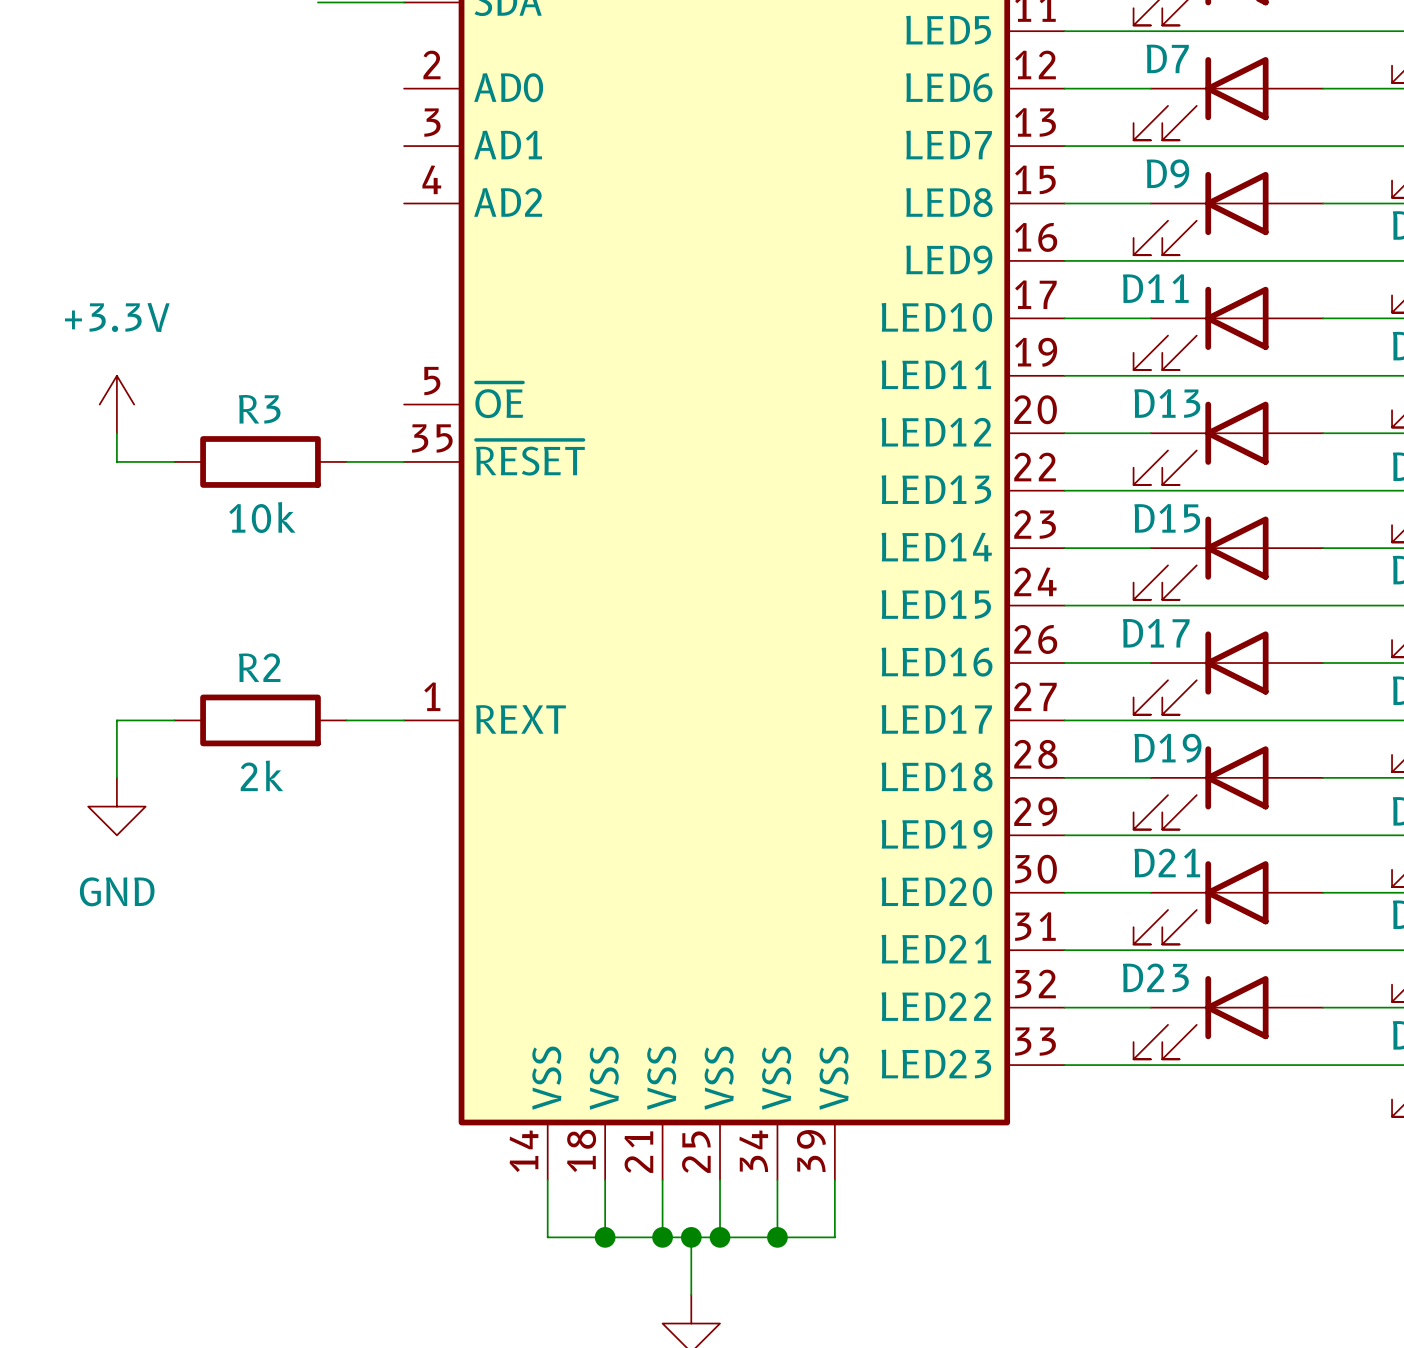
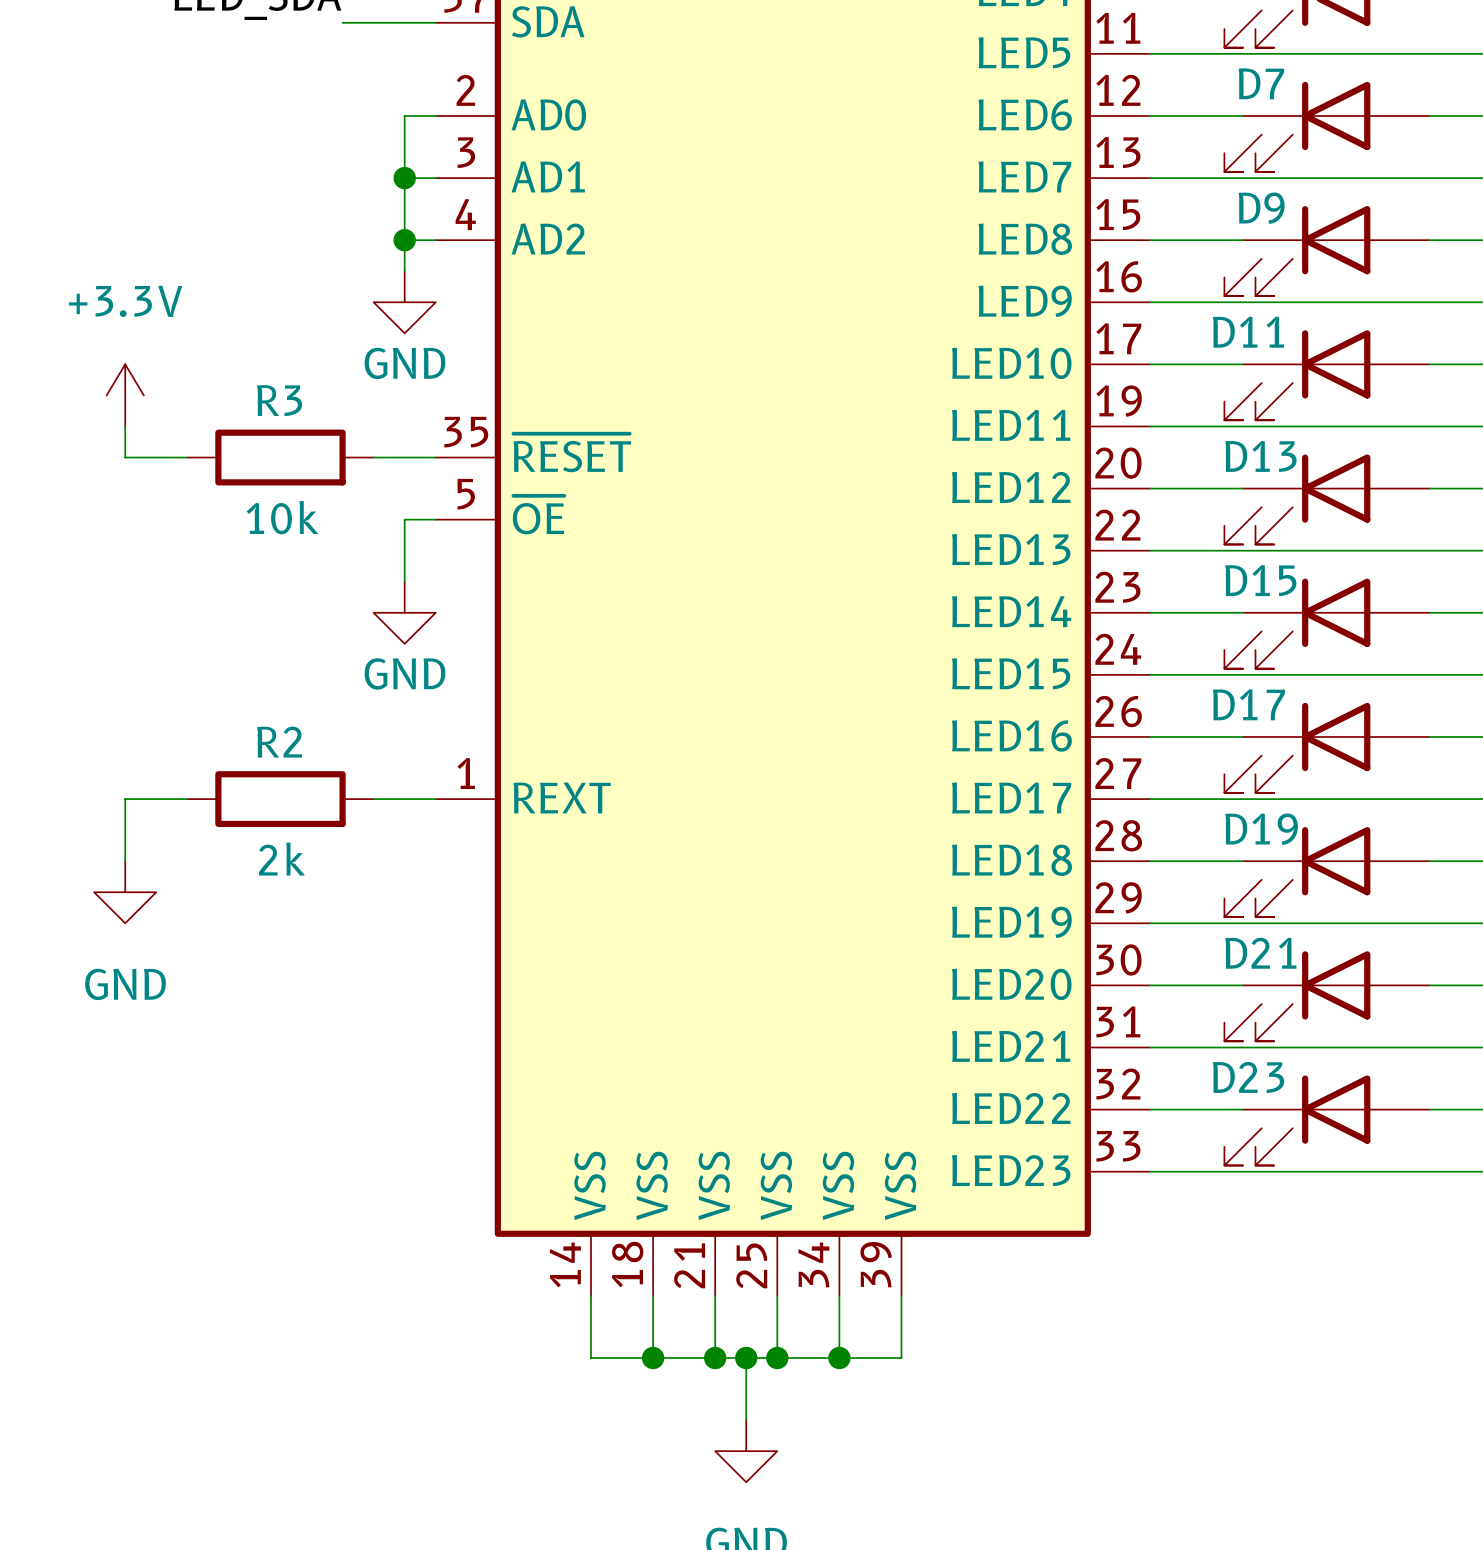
wire: none -> (435, 115) (404, 115) (404, 271)
wire: none -> (404, 178) (435, 178)
junction: none -> (404, 178)
wire: none -> (404, 240) (435, 240)
junction: none -> (404, 240)
power symbol: none -> GND (404, 302)
part pin number: 5 (432, 381) -> 35 (466, 432)
part pin name: ~{OE} (499, 400) -> ~{RESET} (572, 452)
power symbol position: +3.3V (116, 404) -> +3.3V (125, 395)
wire: none -> (373, 457) (435, 457)
wire: (116, 433) (116, 461) (174, 461) -> (125, 426) (125, 457) (187, 457)
part pin number: 35 (432, 438) -> 5 (466, 494)
part pin name: ~{RESET} (530, 457) -> ~{OE} (538, 515)
R3 position: (260, 461) -> (280, 457)
wire: (346, 461) (375, 461) -> (404, 581) (404, 519)
power symbol: none -> GND (404, 612)

